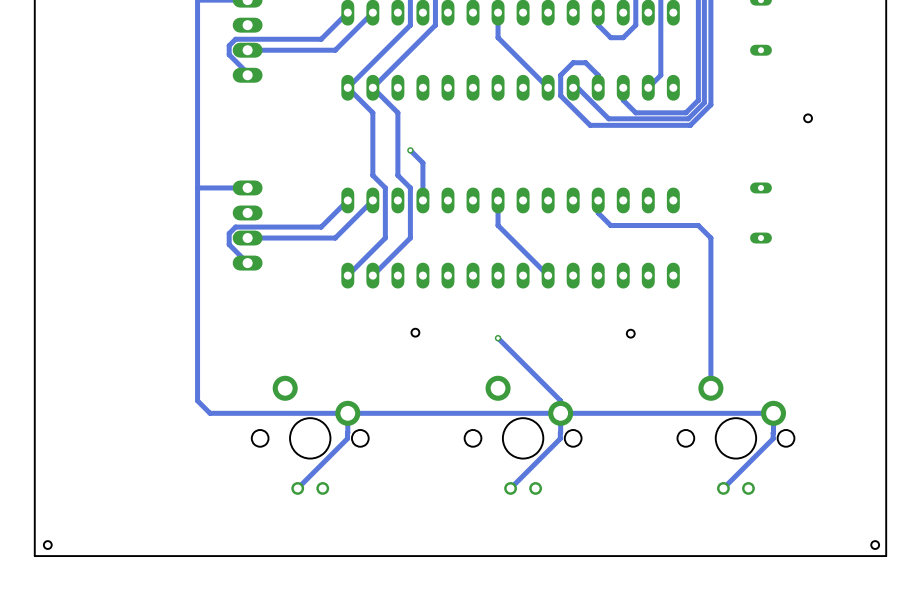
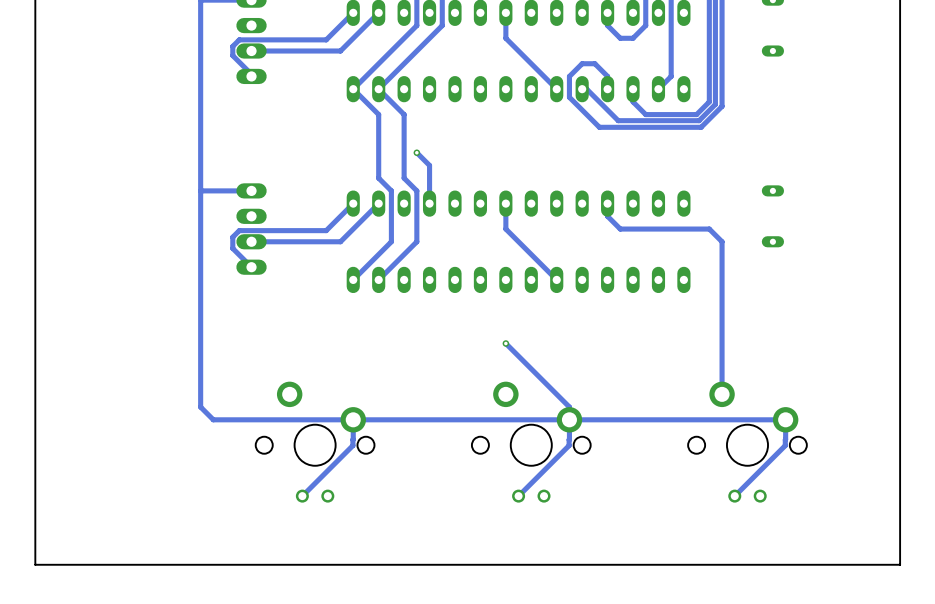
hole: (808, 118) -> none
hole: (415, 332) -> none
hole: (630, 333) -> none
hole: (47, 545) -> none
hole: (875, 545) -> none

